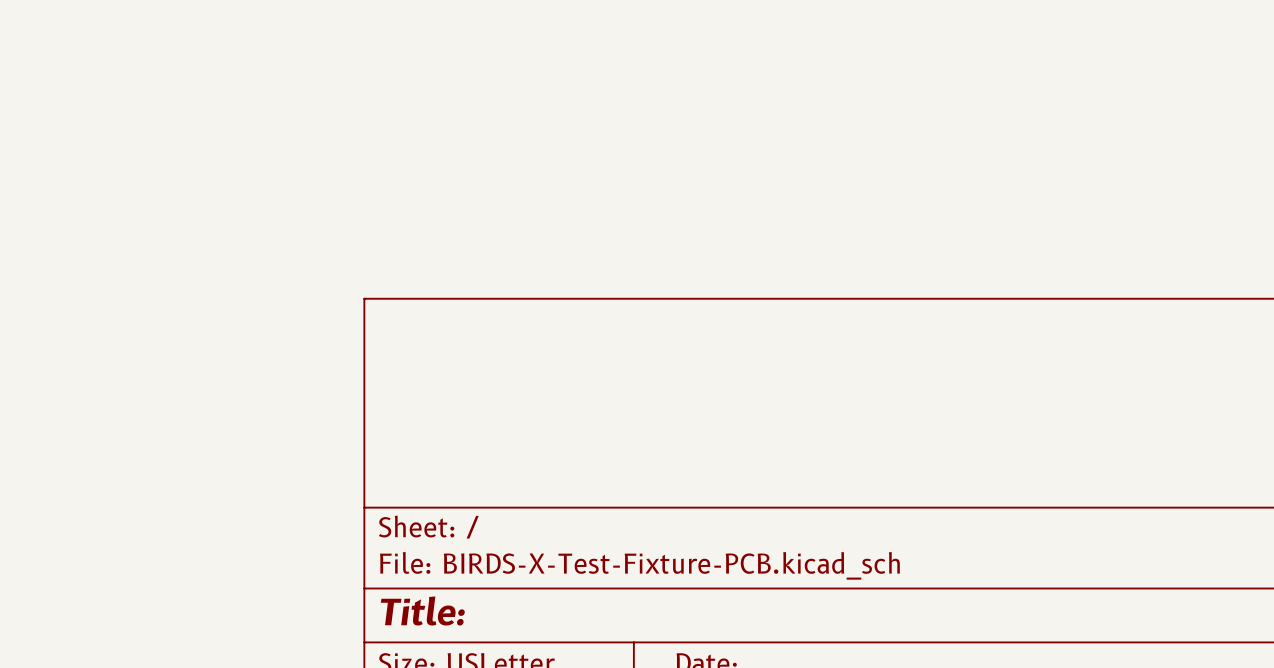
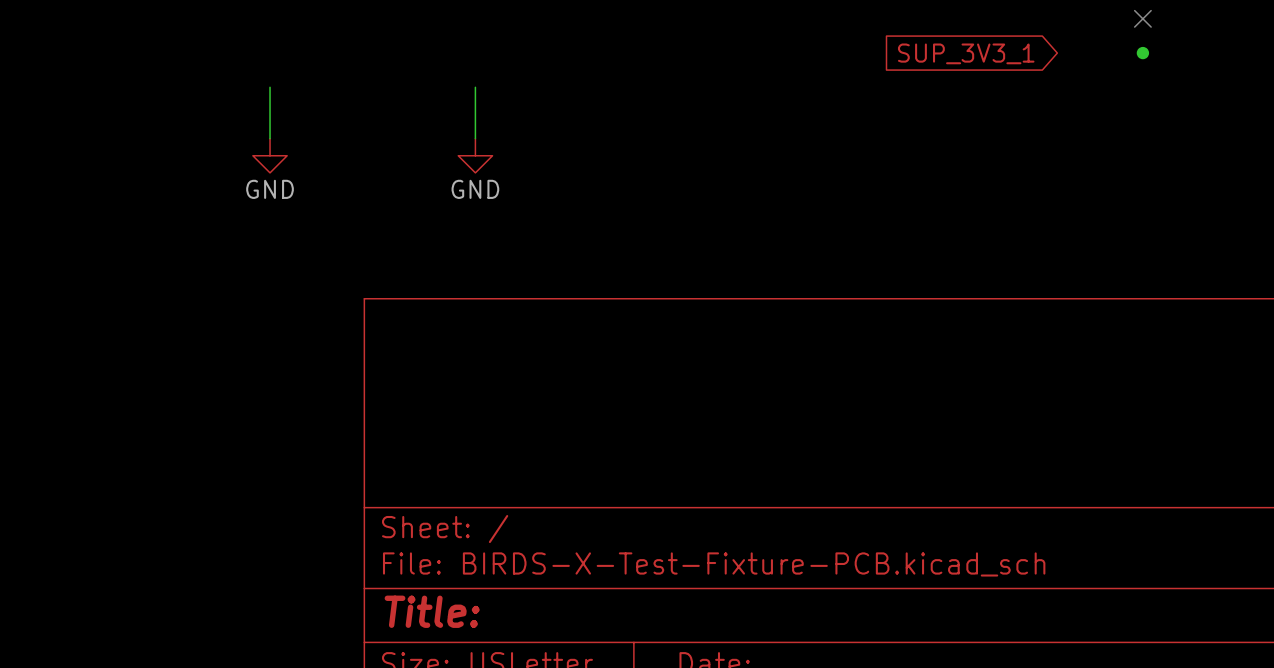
no-connect mark: none -> (1142, 18)
junction: none -> (1142, 53)
global label: none -> SUP_3V3_1 (966, 53)
wire: none -> (270, 87) (270, 138)
wire: none -> (475, 87) (475, 138)
power symbol: none -> GND (270, 155)
power symbol: none -> GND (475, 155)

